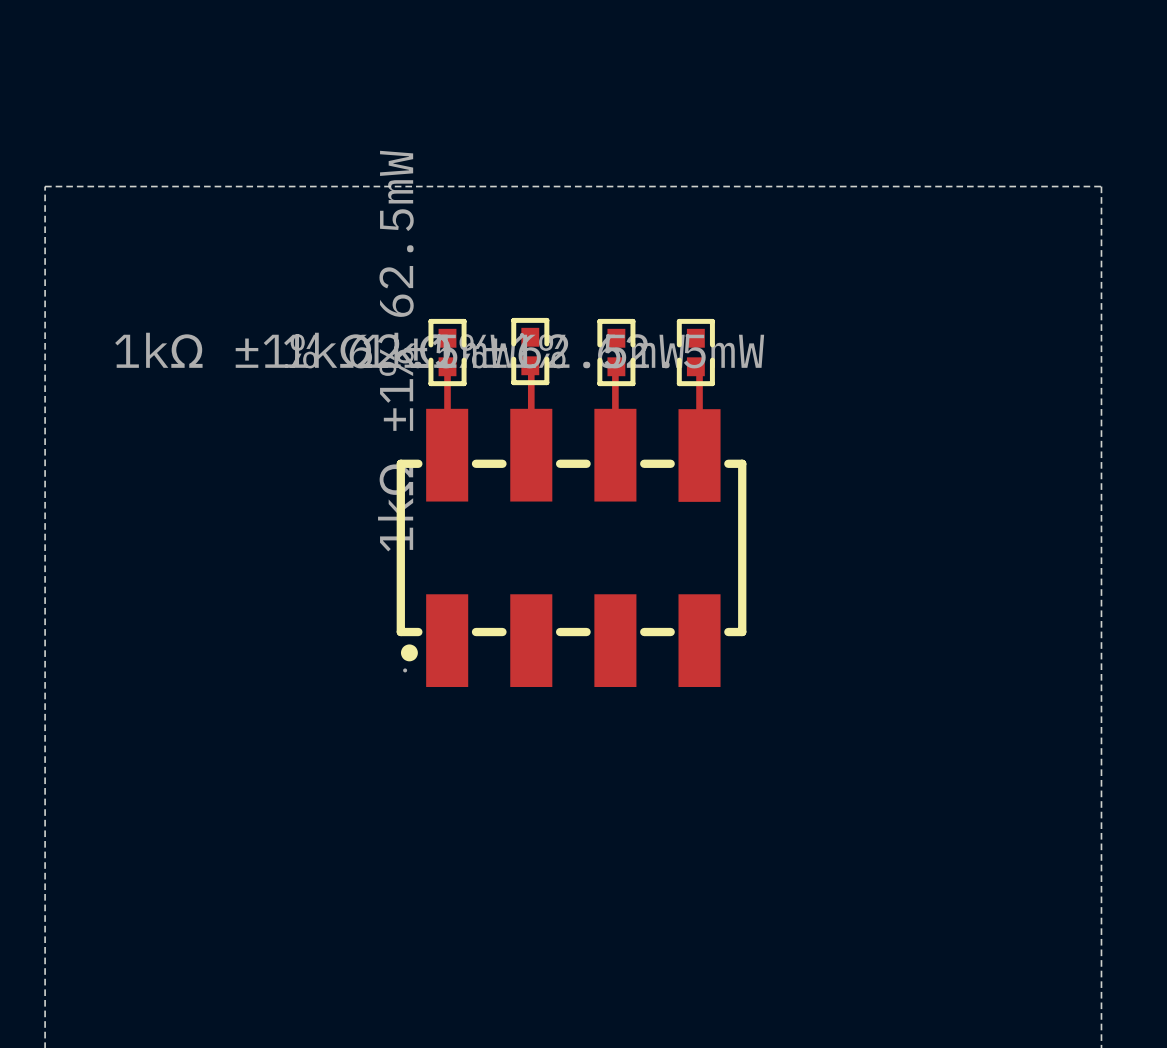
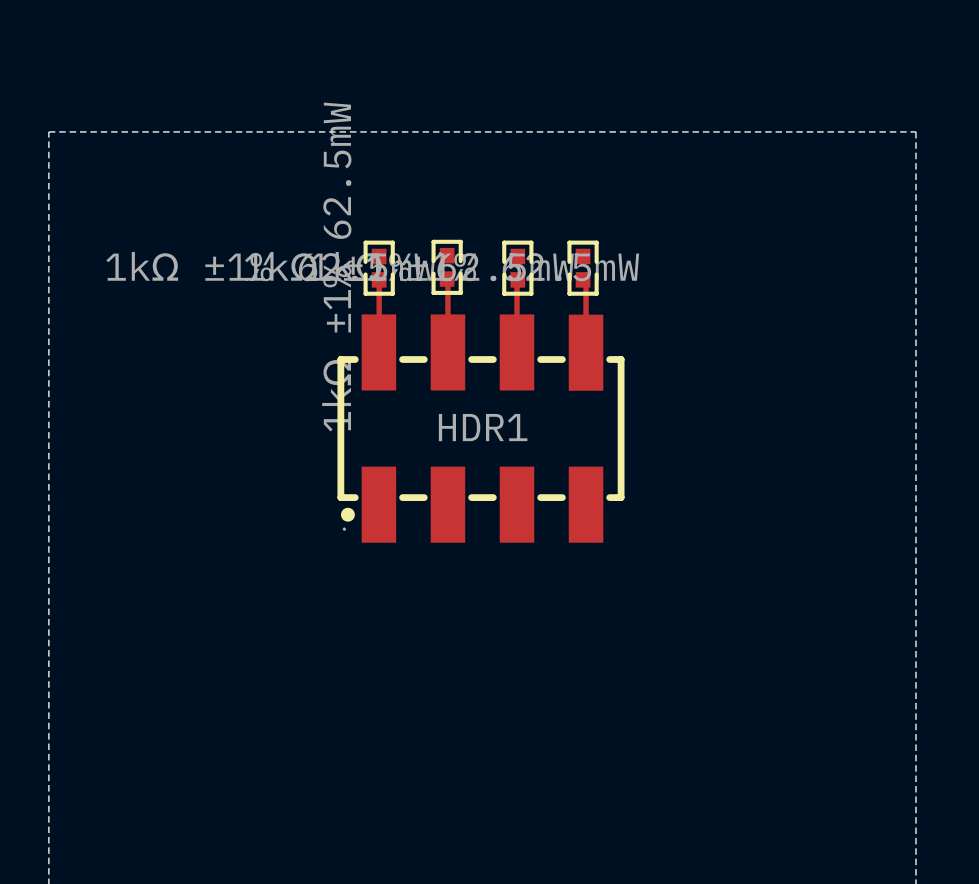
HDR1 name: none -> HDR1 (483, 427)

